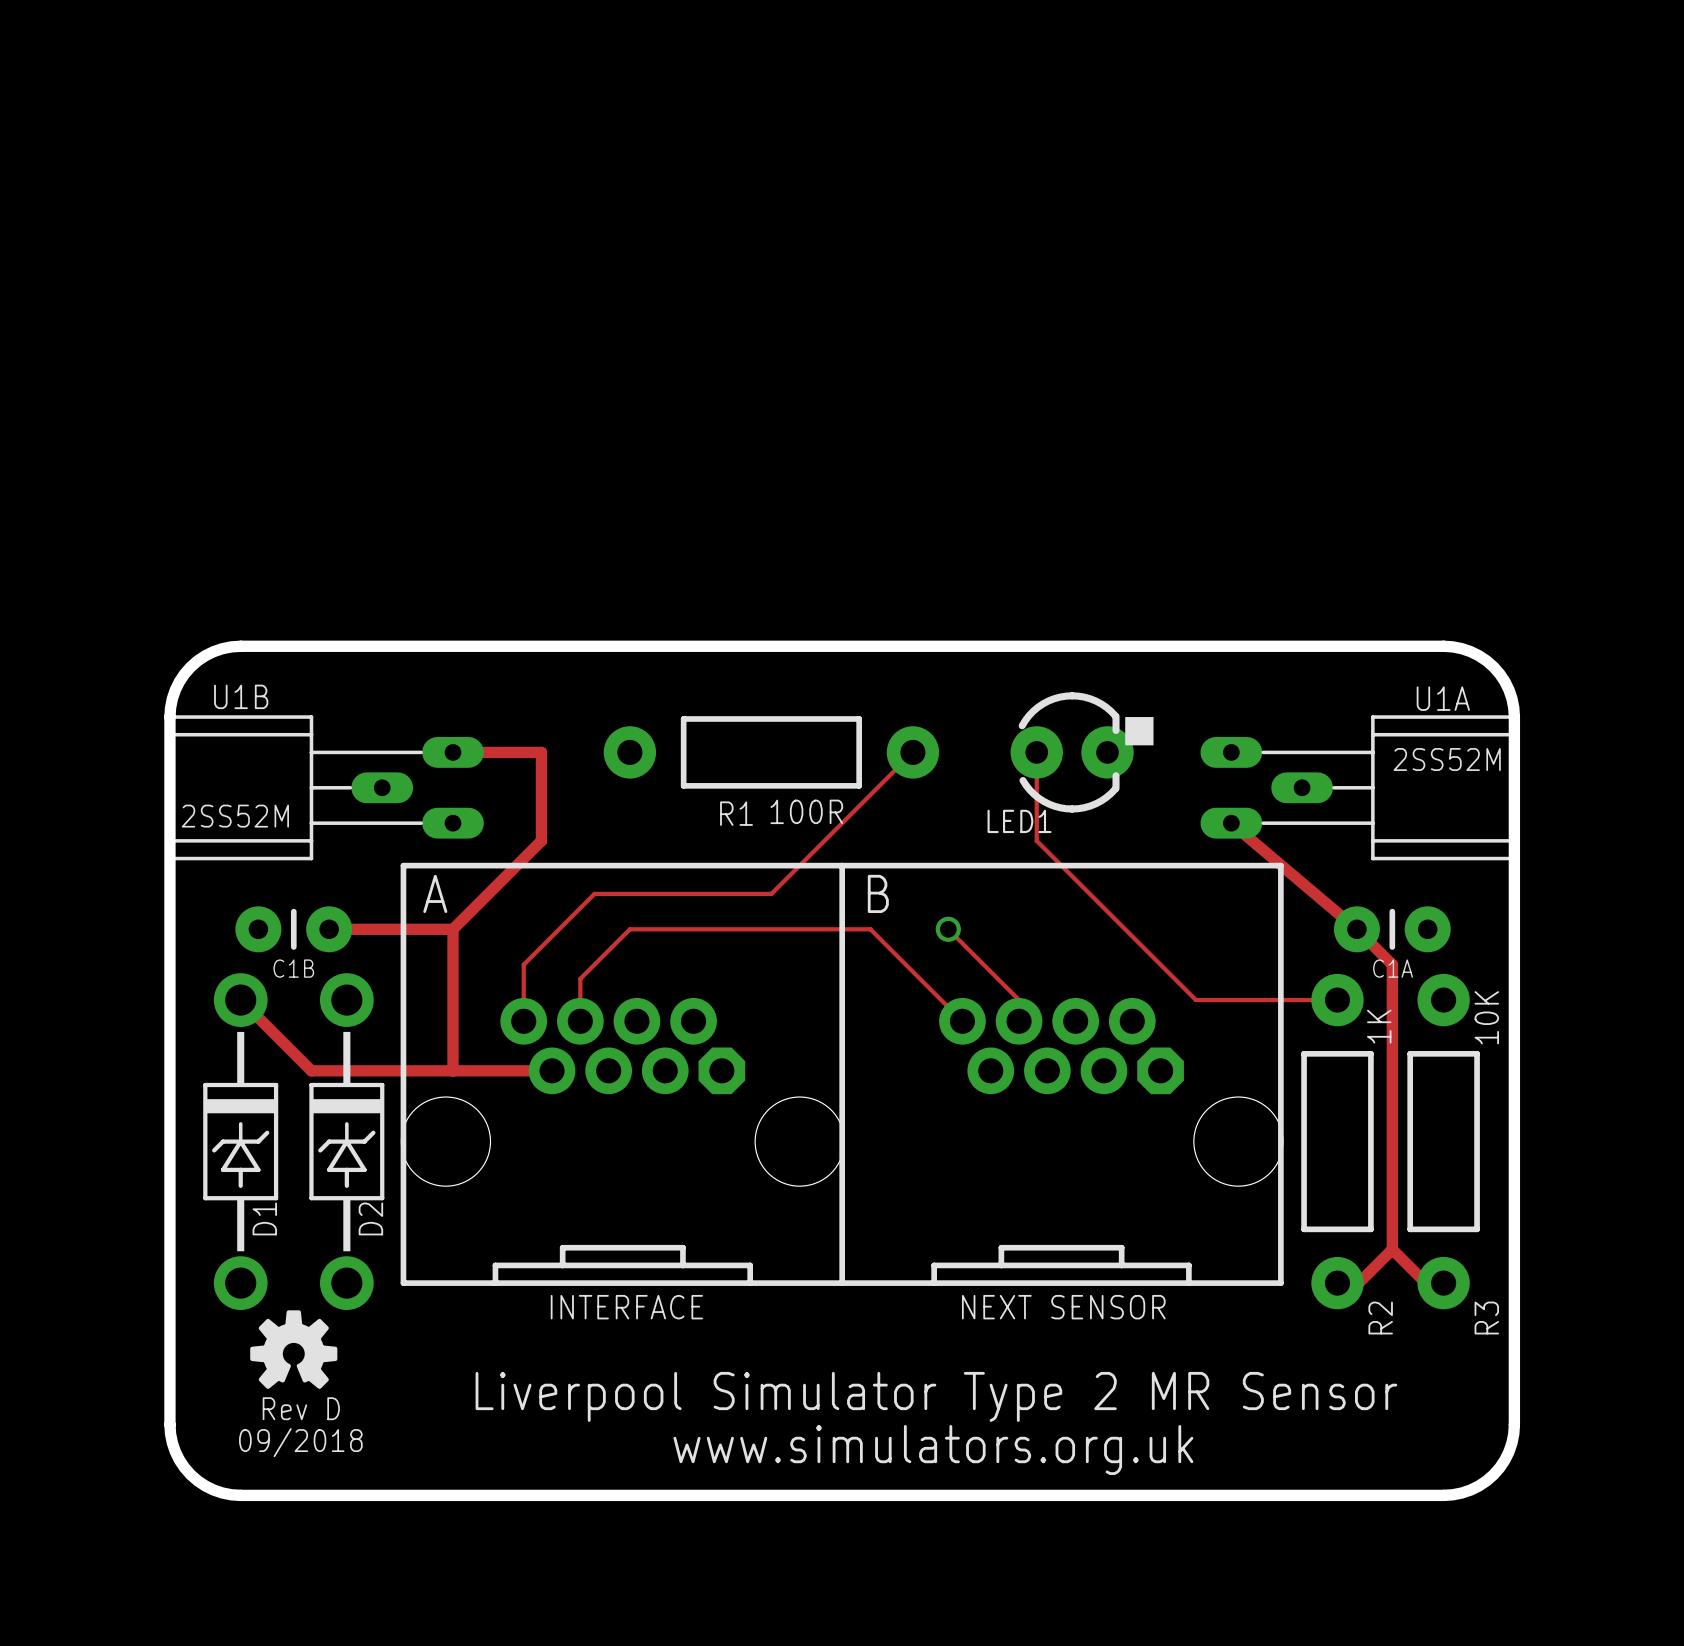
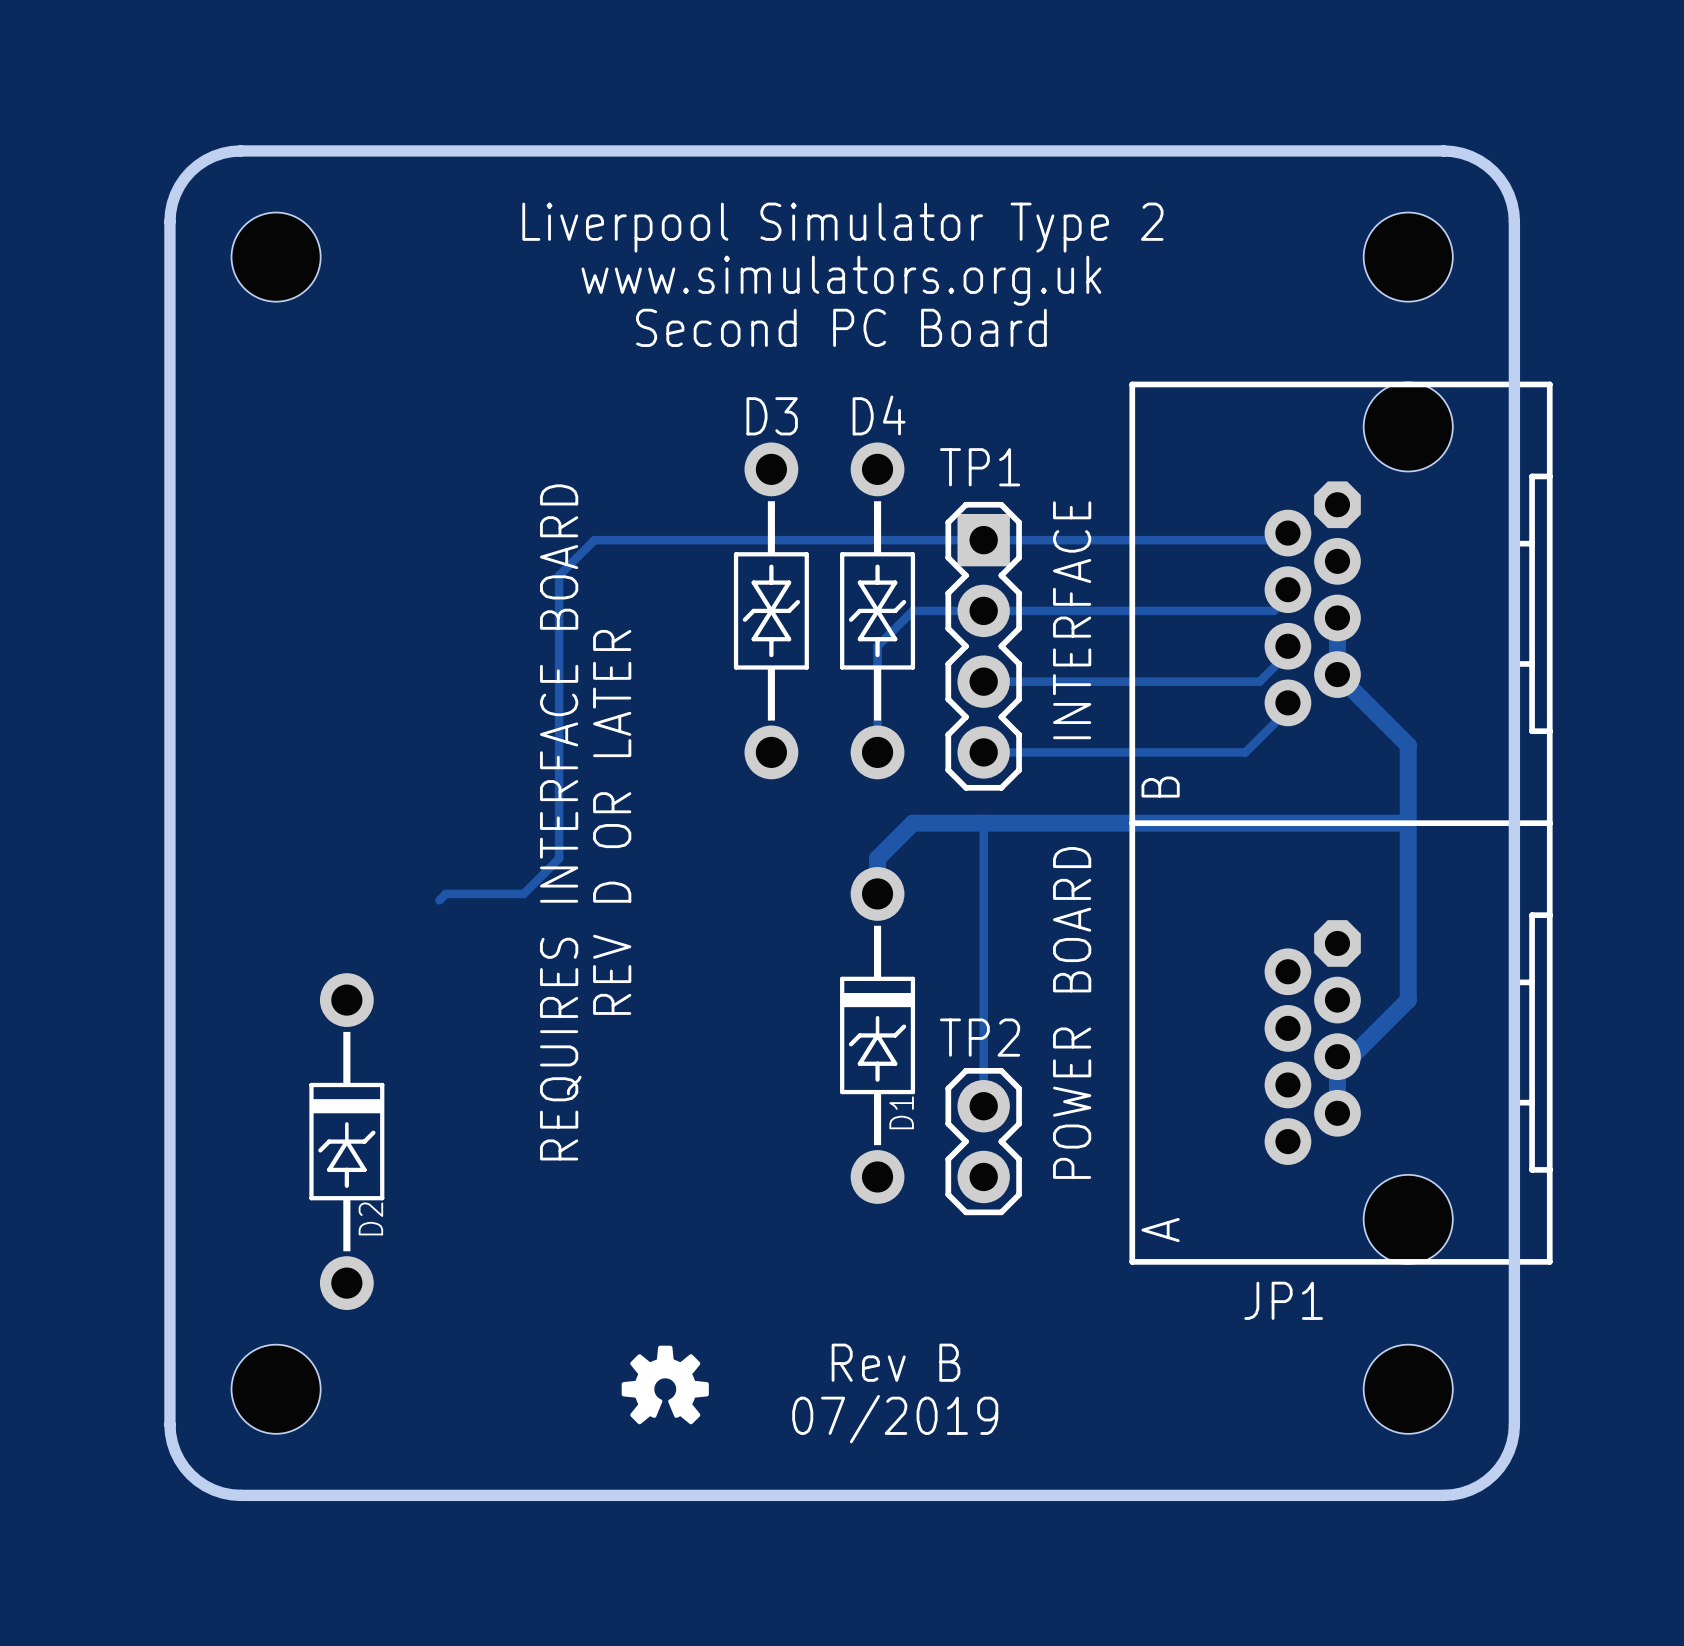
text: none -> Liverpool Simulator Type 2 (842, 227)
hole: none -> (276, 257)
hole: none -> (1408, 257)
text: none -> www.simulators.org.uk (841, 280)
text: none -> Second PC Board (841, 327)
track: none -> (1287, 533) (1280, 540) (594, 540) (559, 575) (559, 858) (523, 893) (445, 893) (439, 900)
track: none -> (1287, 589) (1287, 596) (1273, 610) (912, 610) (877, 646) (877, 752)
D3: none -> (771, 610)
D4: none -> (877, 610)
track: none -> (1337, 617) (1337, 674) (1408, 745) (1408, 1000) (1351, 1056) (1337, 1056) (1337, 1113)
TP1: none -> (983, 646)
track: none -> (1287, 646) (1287, 653) (1259, 681) (983, 681)
track: none -> (1287, 702) (1287, 709) (1245, 752) (983, 752)
board edge: (169, 717) (175, 689) (190, 667) (213, 651) (240, 646) (1443, 646) (1470, 651) (1493, 667) (1509, 689) (1514, 717) -> (169, 717) (170, 212) (175, 194) (190, 171) (213, 156) (240, 150) (1443, 150) (1470, 156) (1486, 165) (1499, 178) (1509, 194) (1513, 212) (1514, 717)
drawing: [1125, 717, 1154, 746] -> none
track: (452, 752) (541, 752) (541, 840) (452, 929) -> none
R1: 100R (771, 752) -> none
track: (912, 752) (771, 893) (594, 893) (523, 964) (523, 1021) -> none
track: (1036, 752) (1036, 840) (1195, 1000) (1337, 1000) -> none
LED1: (1072, 752) -> none
U1B: (326, 787) -> none
U1A: (1358, 787) -> none
text: none -> REQUIRES INTERFACE BOARD (560, 822)
text: none -> REV D OR LATER (612, 822)
track: none -> (983, 823) (983, 1106)
track: (1231, 823) (1356, 929) (1392, 964) (1392, 1249) -> none
JP1: none -> (1341, 823)
track: none -> (1408, 823) (912, 823) (877, 858) (877, 893)
text: none -> POWER BOARD INTERFACE (1072, 840)
C1B: (293, 929) -> none
track: (329, 929) (452, 929) -> none
track: (452, 929) (452, 1070) -> none
track: (948, 929) (1019, 1000) (1019, 1021) -> none
via: (948, 929) -> none
C1A: (1392, 929) -> none
track: (240, 1000) (311, 1070) (552, 1070) -> none
track: (580, 1021) (580, 978) (629, 929) (870, 929) (962, 1021) -> none
part: (842, 1074) -> none
D1 position: (240, 1141) -> (877, 1035)
TP2: none -> (983, 1141)
R2: 1K (1337, 1141) -> none
R3: 10K (1443, 1141) -> none
track: (1392, 1249) (1358, 1283) (1337, 1283) -> none
track: (1392, 1249) (1425, 1283) (1443, 1283) -> none
text: INTERFACE (626, 1307) -> none
text: NEXT SENSOR (1063, 1307) -> none
drawing position: (293, 1349) -> (665, 1384)
text: none -> Rev B (896, 1362)
hole: none -> (276, 1389)
hole: none -> (1408, 1389)
text: Liverpool Simulator Type 2 MR Sensor (936, 1396) -> none
text: Rev D (301, 1408) -> none
text: none -> 07/2019 (895, 1419)
text: 09/2018 (300, 1442) -> none
text: www.simulators.org.uk (933, 1449) -> none

